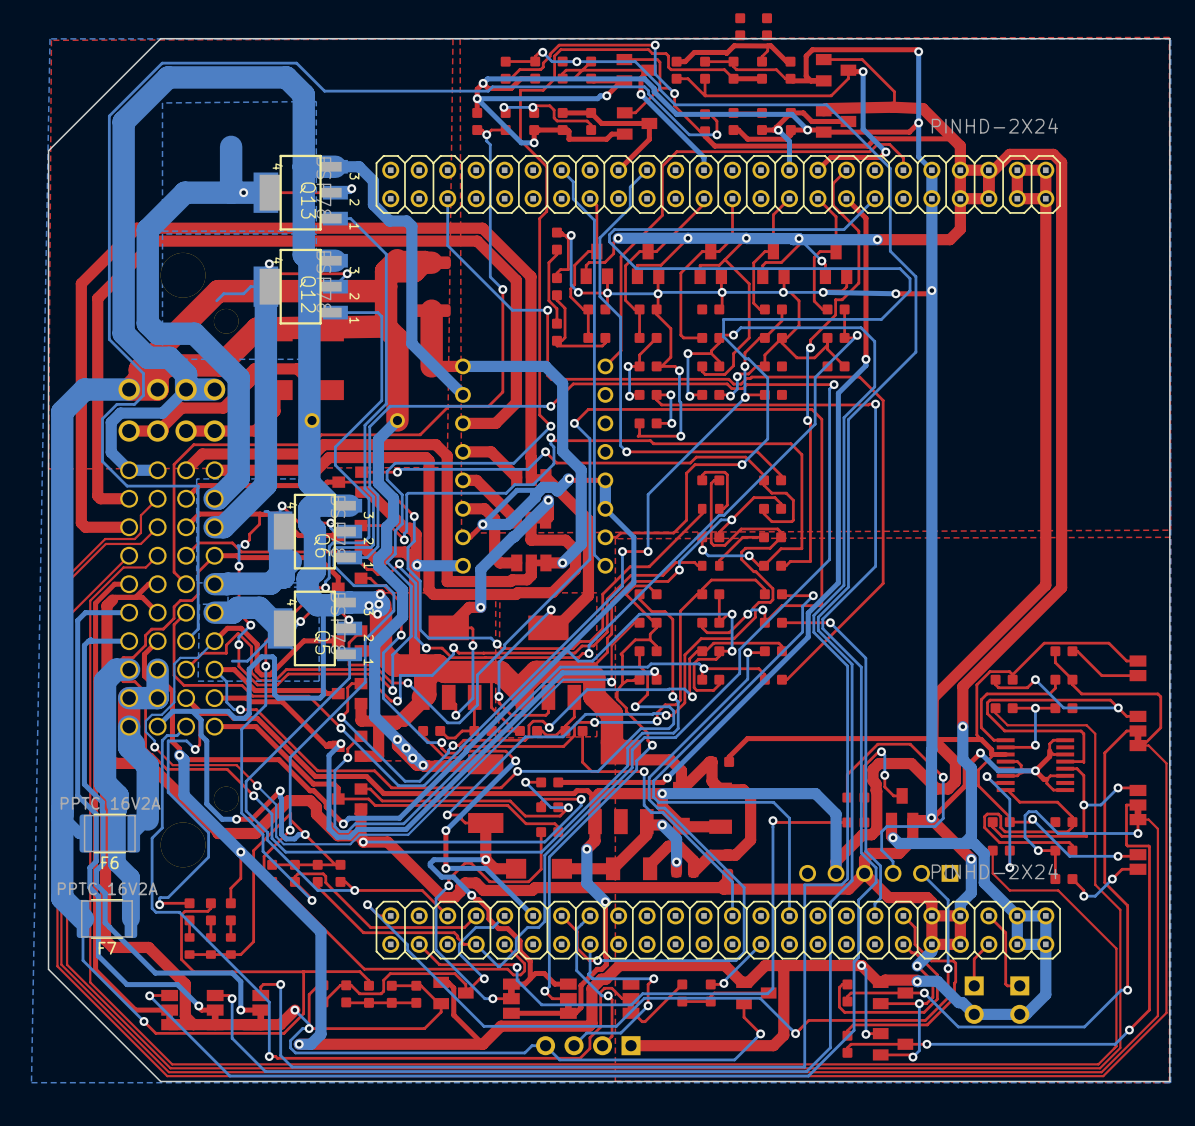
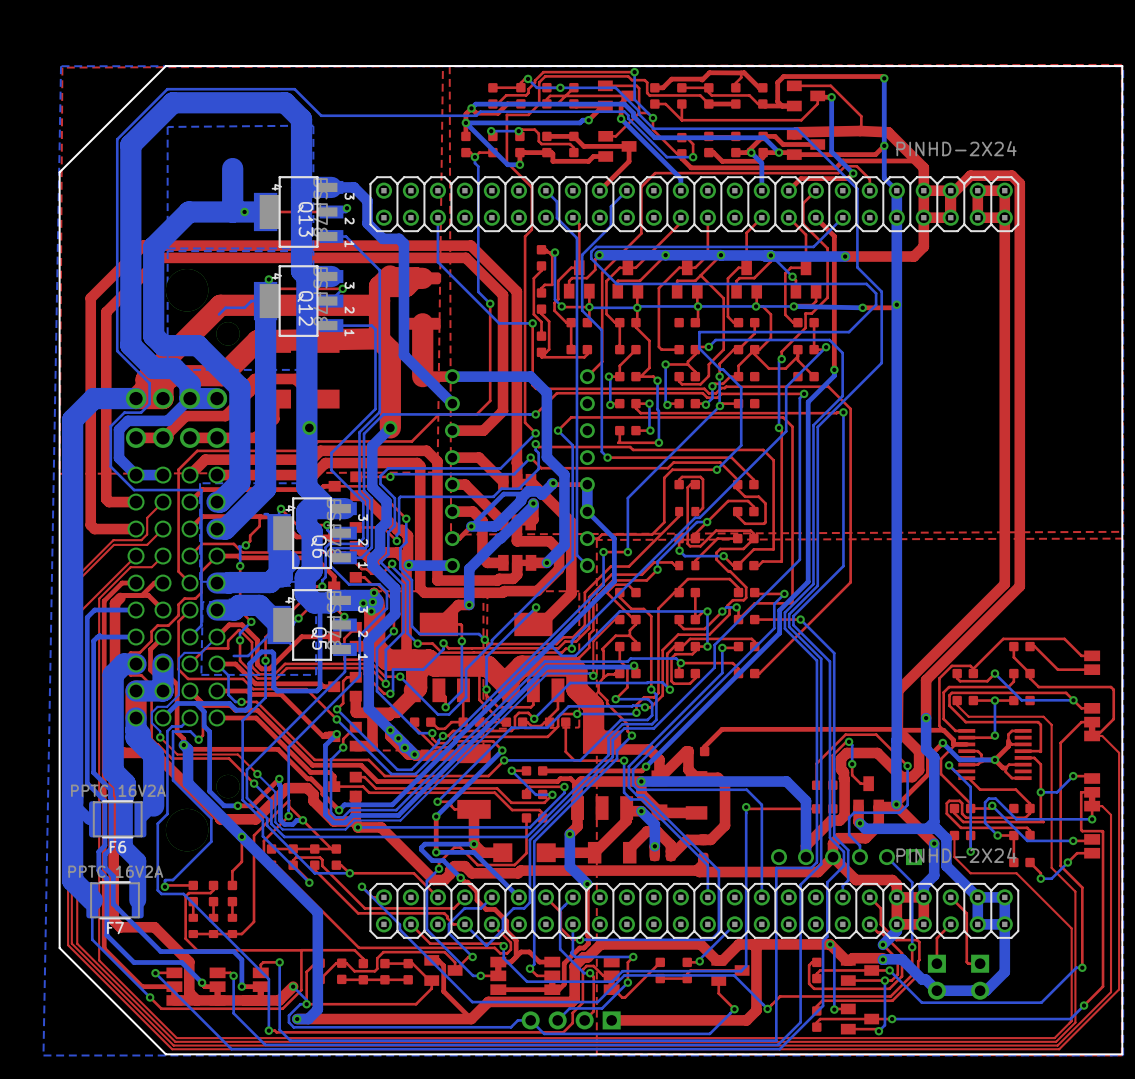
part: (740, 26) -> none
part: (767, 26) -> none

